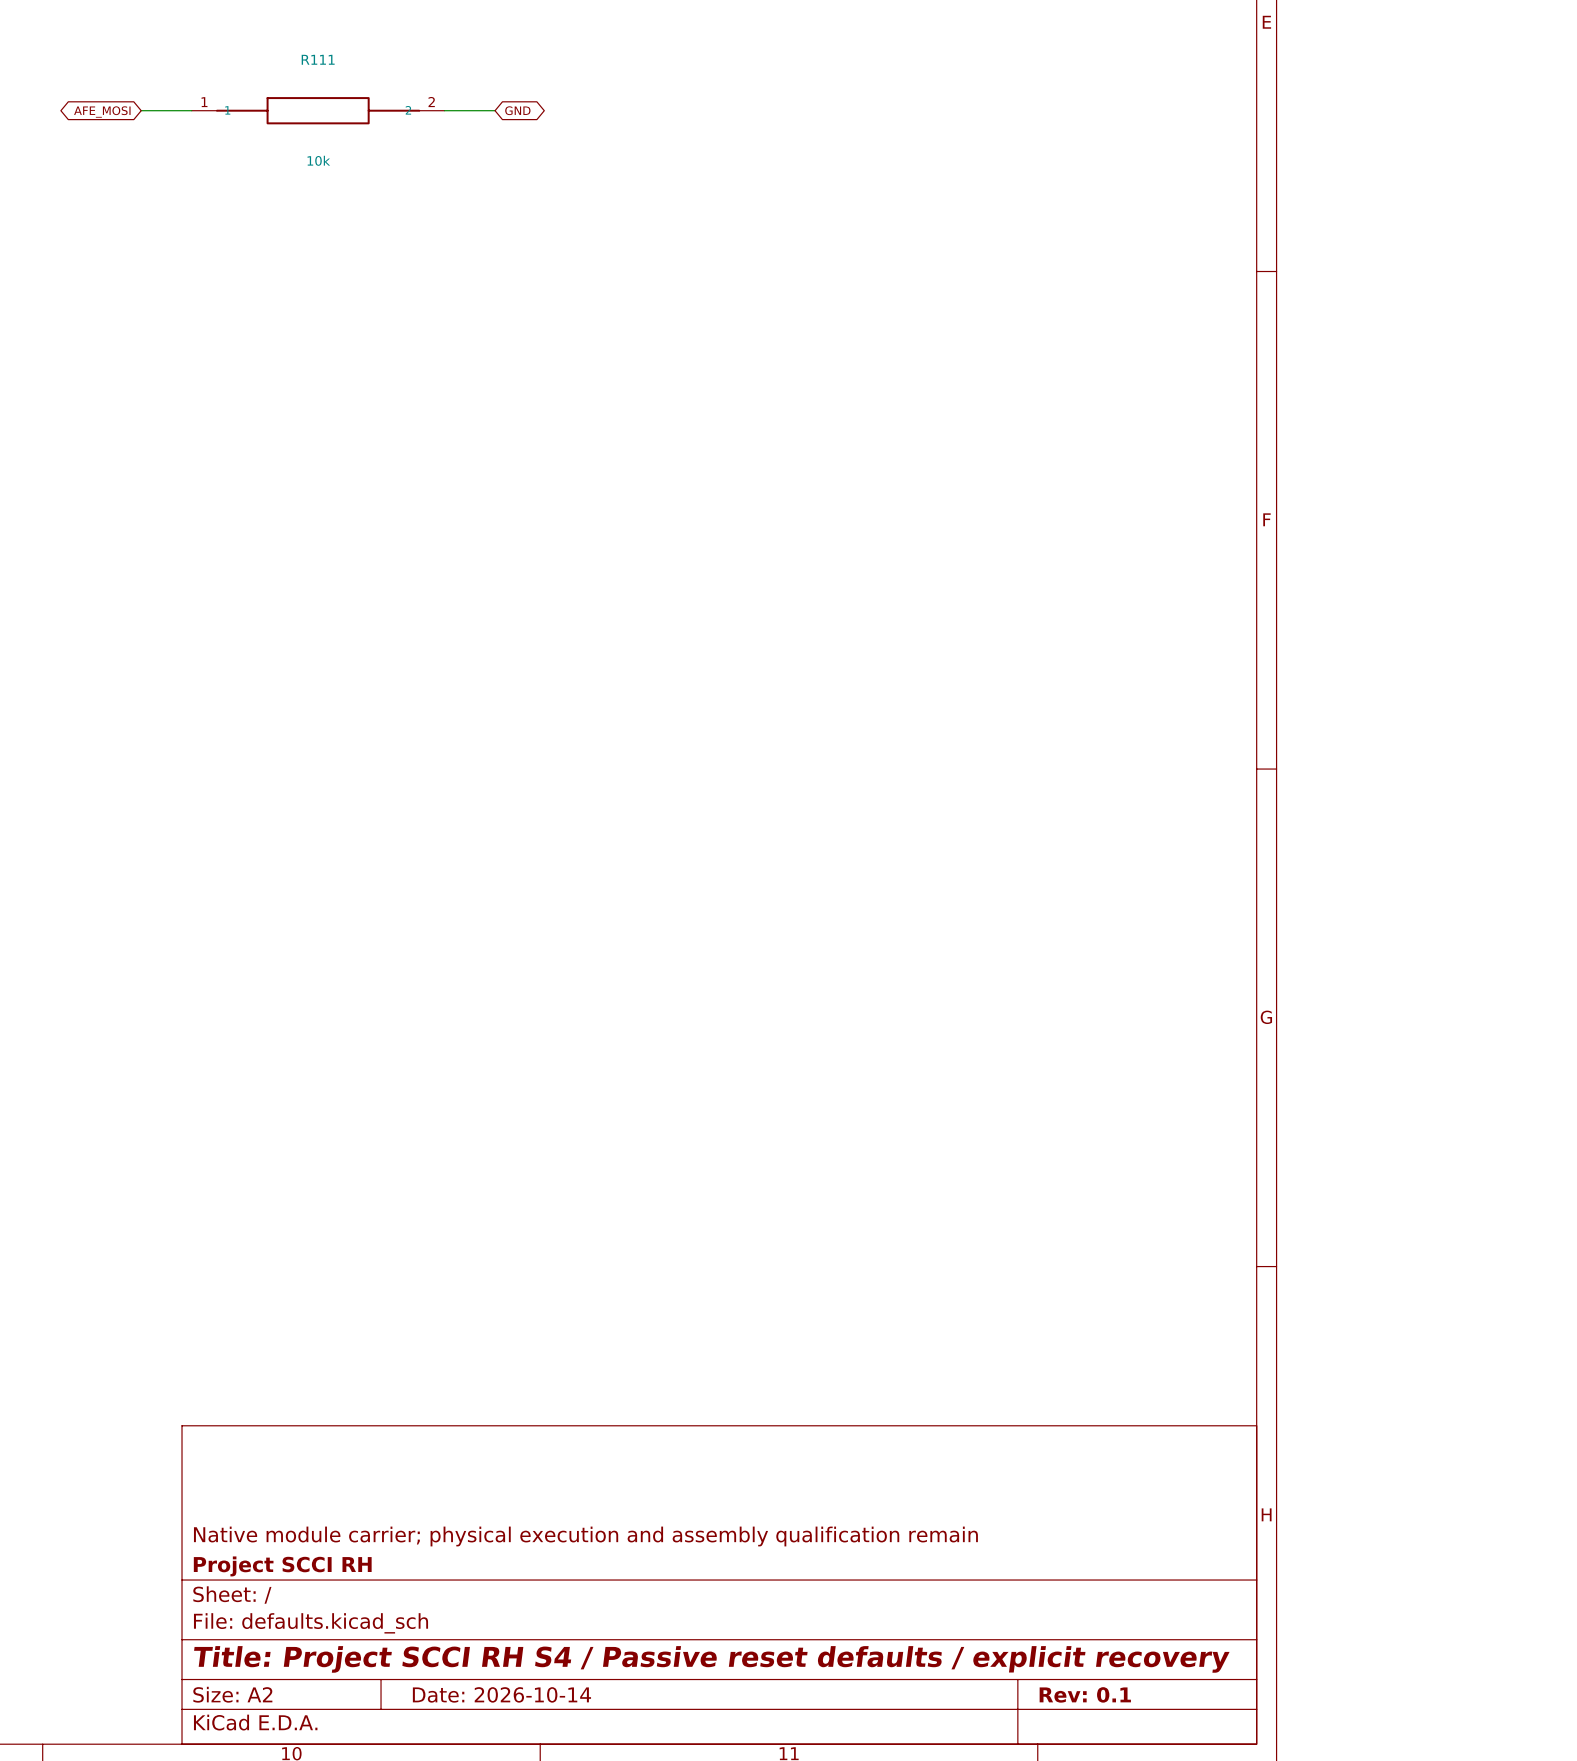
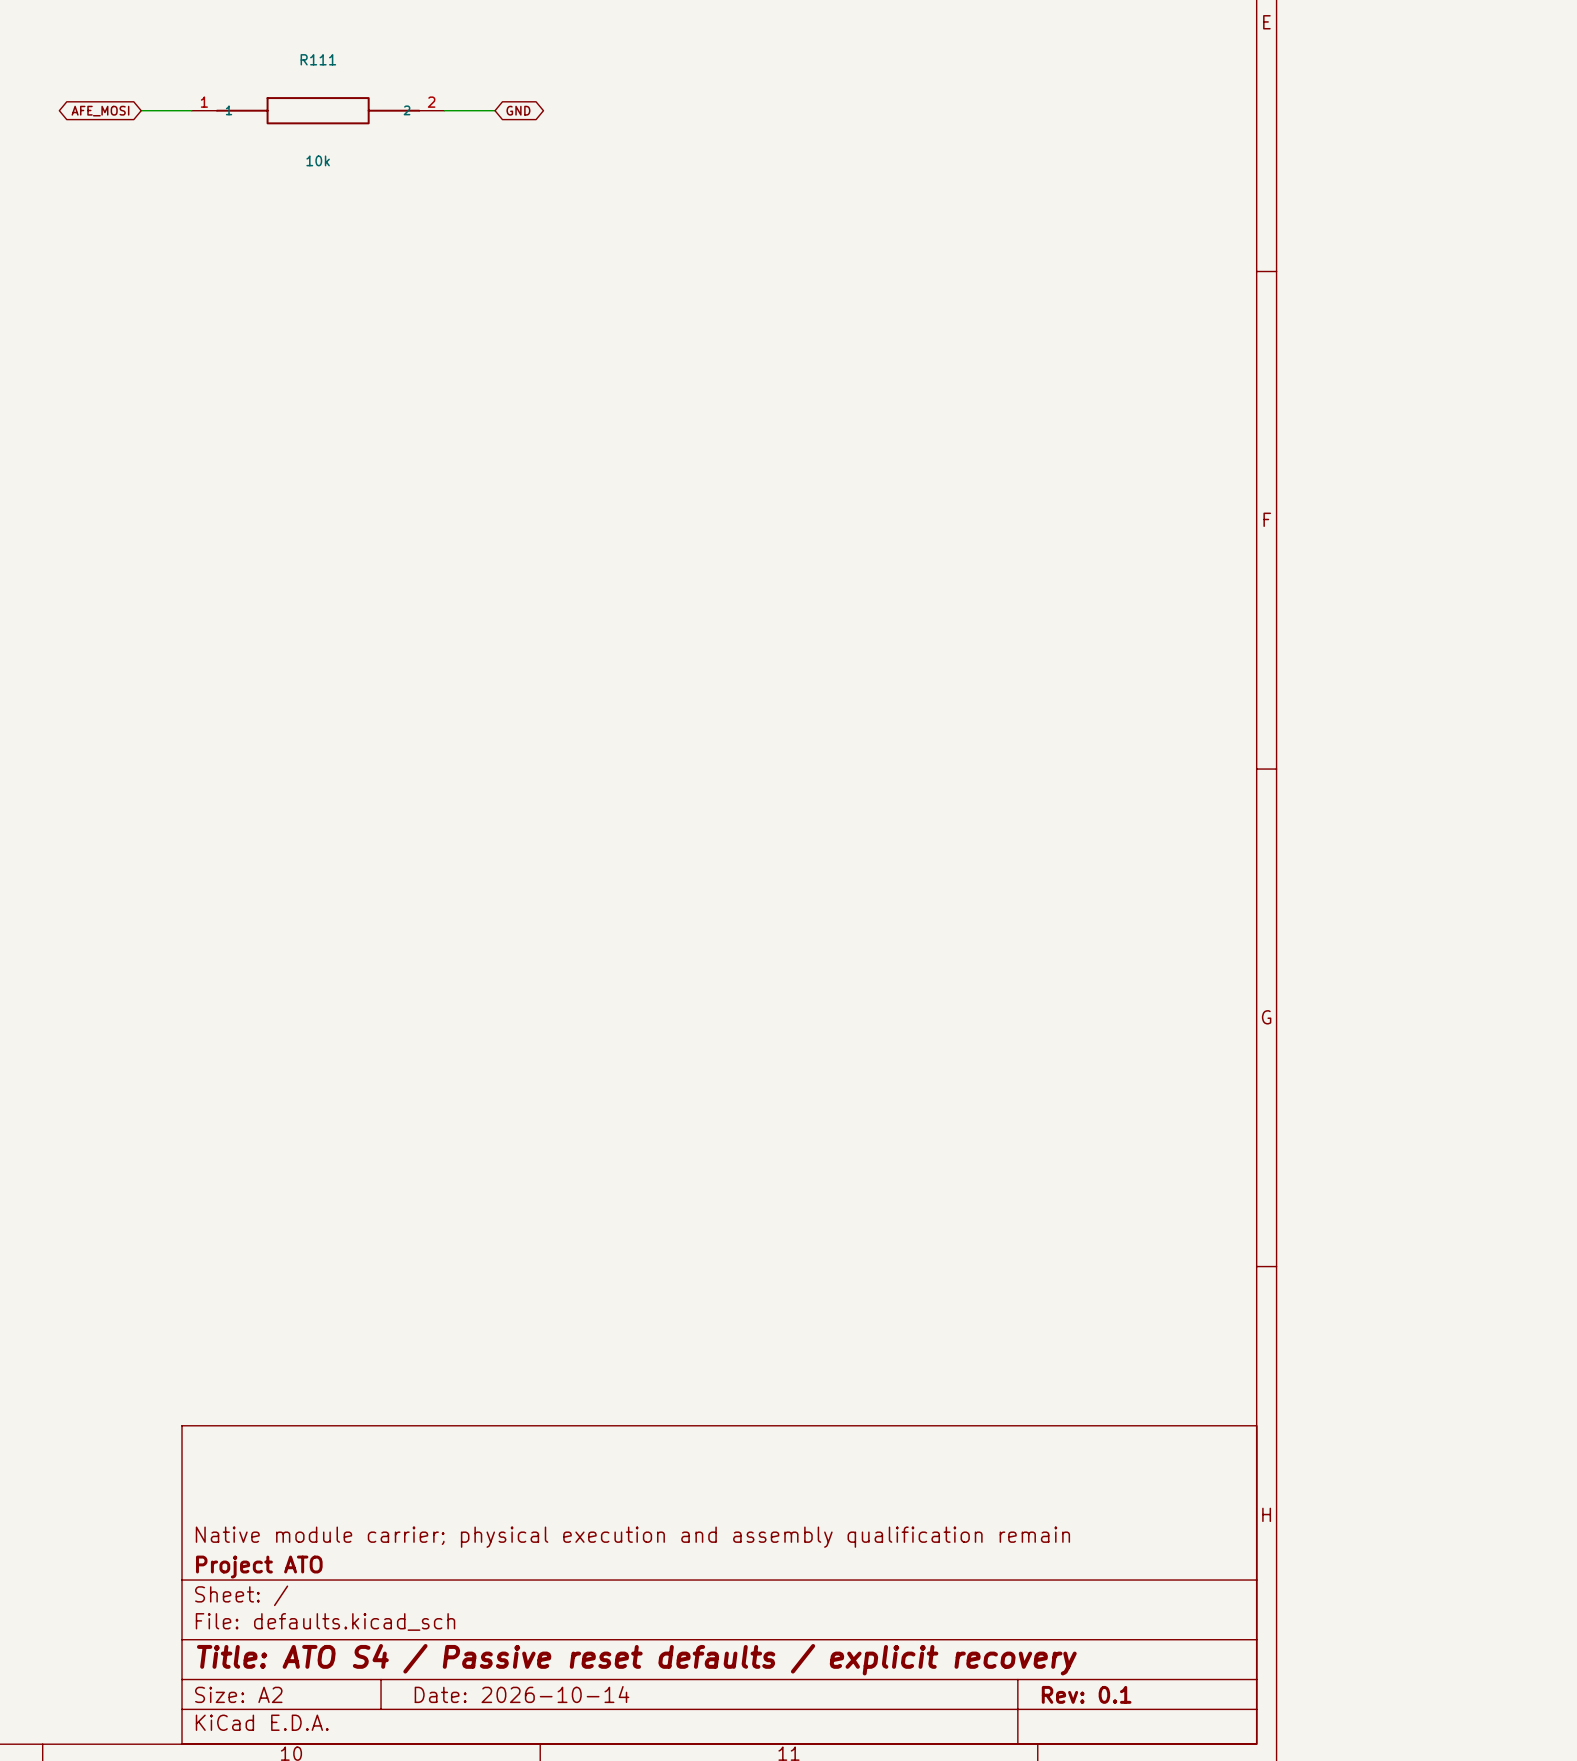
title block: Project SCCI RH (282, 1566) -> Project ATO (259, 1567)
title block: Title: Project SCCI RH S4 / Passive reset defaults / explicit recovery (711, 1659) -> Title: ATO S4 / Passive reset defaults / explicit recovery (636, 1659)

